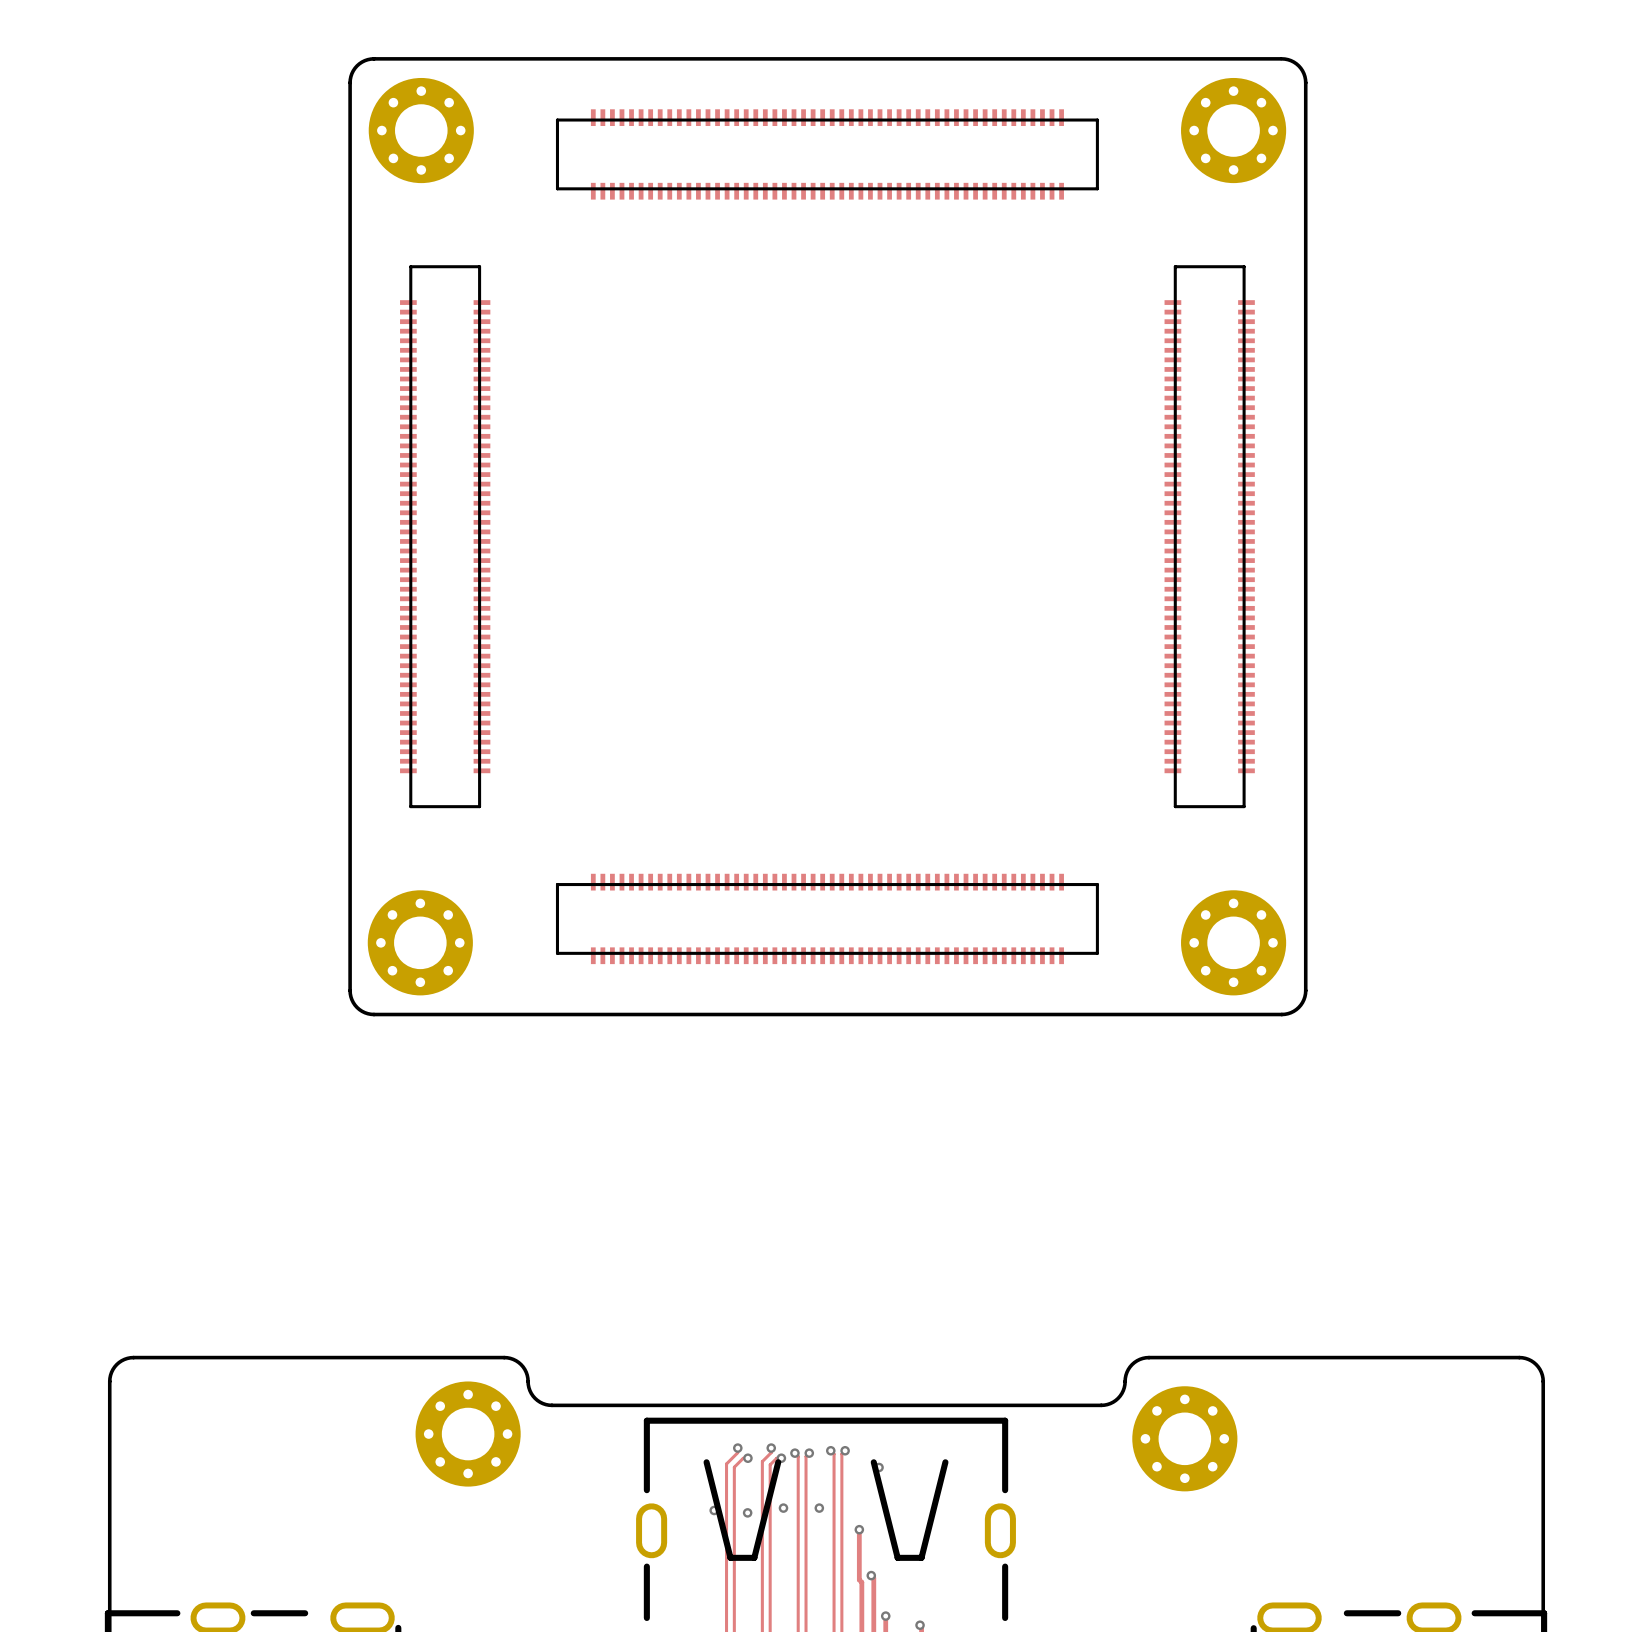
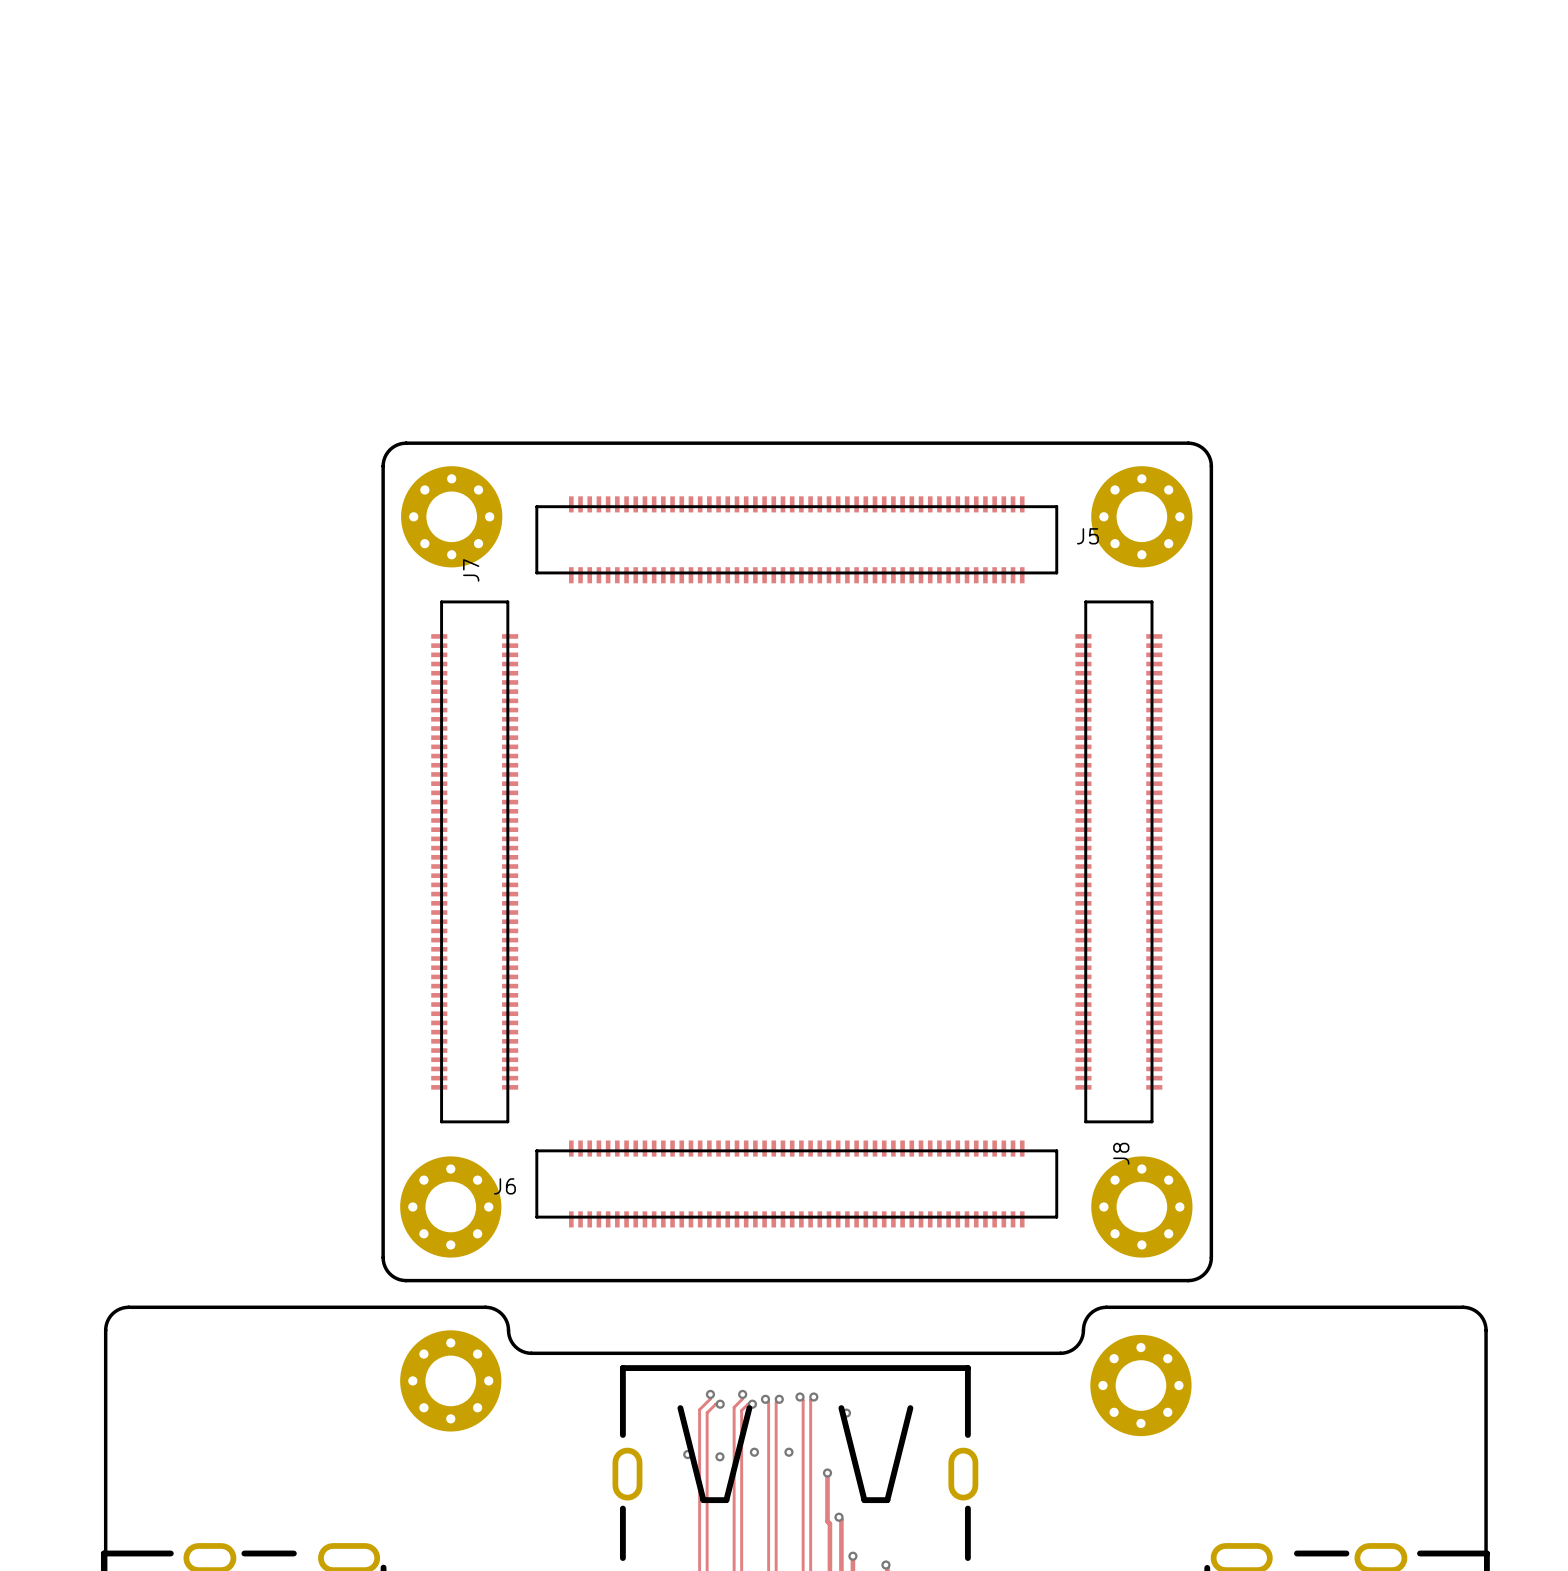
board edge: (1280, 58) (373, 58) (364, 60) (357, 65) (351, 73) (350, 82) (350, 990) (351, 999) (357, 1007) (364, 1012) (373, 1014) (1281, 1014) (1290, 1012) (1298, 1007) (1303, 999) (1305, 990) (1305, 82) (1303, 73) (1298, 65) (1290, 60) (1281, 58) -> none
part: (421, 130) -> none
part: (1233, 130) -> none
part: (827, 154) -> none
part footprint: [400, 265, 491, 809] -> [401, 466, 503, 568]
part footprint: [1164, 265, 1255, 809] -> [1091, 466, 1193, 568]
board edge: none -> (406, 443) (1188, 443) (1197, 444) (1204, 449) (1209, 457) (1211, 466) (1211, 1257) (1209, 1266) (1204, 1273) (1197, 1278) (1188, 1280) (406, 1280) (397, 1278) (389, 1273) (384, 1266) (383, 1257) (383, 466) (384, 457) (389, 449) (397, 444) (406, 443)
J5: none -> (796, 539)
J7: none -> (474, 861)
J8: none -> (1118, 861)
part: (827, 918) -> none
part position: (420, 942) -> (450, 1206)
part position: (1233, 942) -> (1141, 1206)
J6: none -> (796, 1183)

